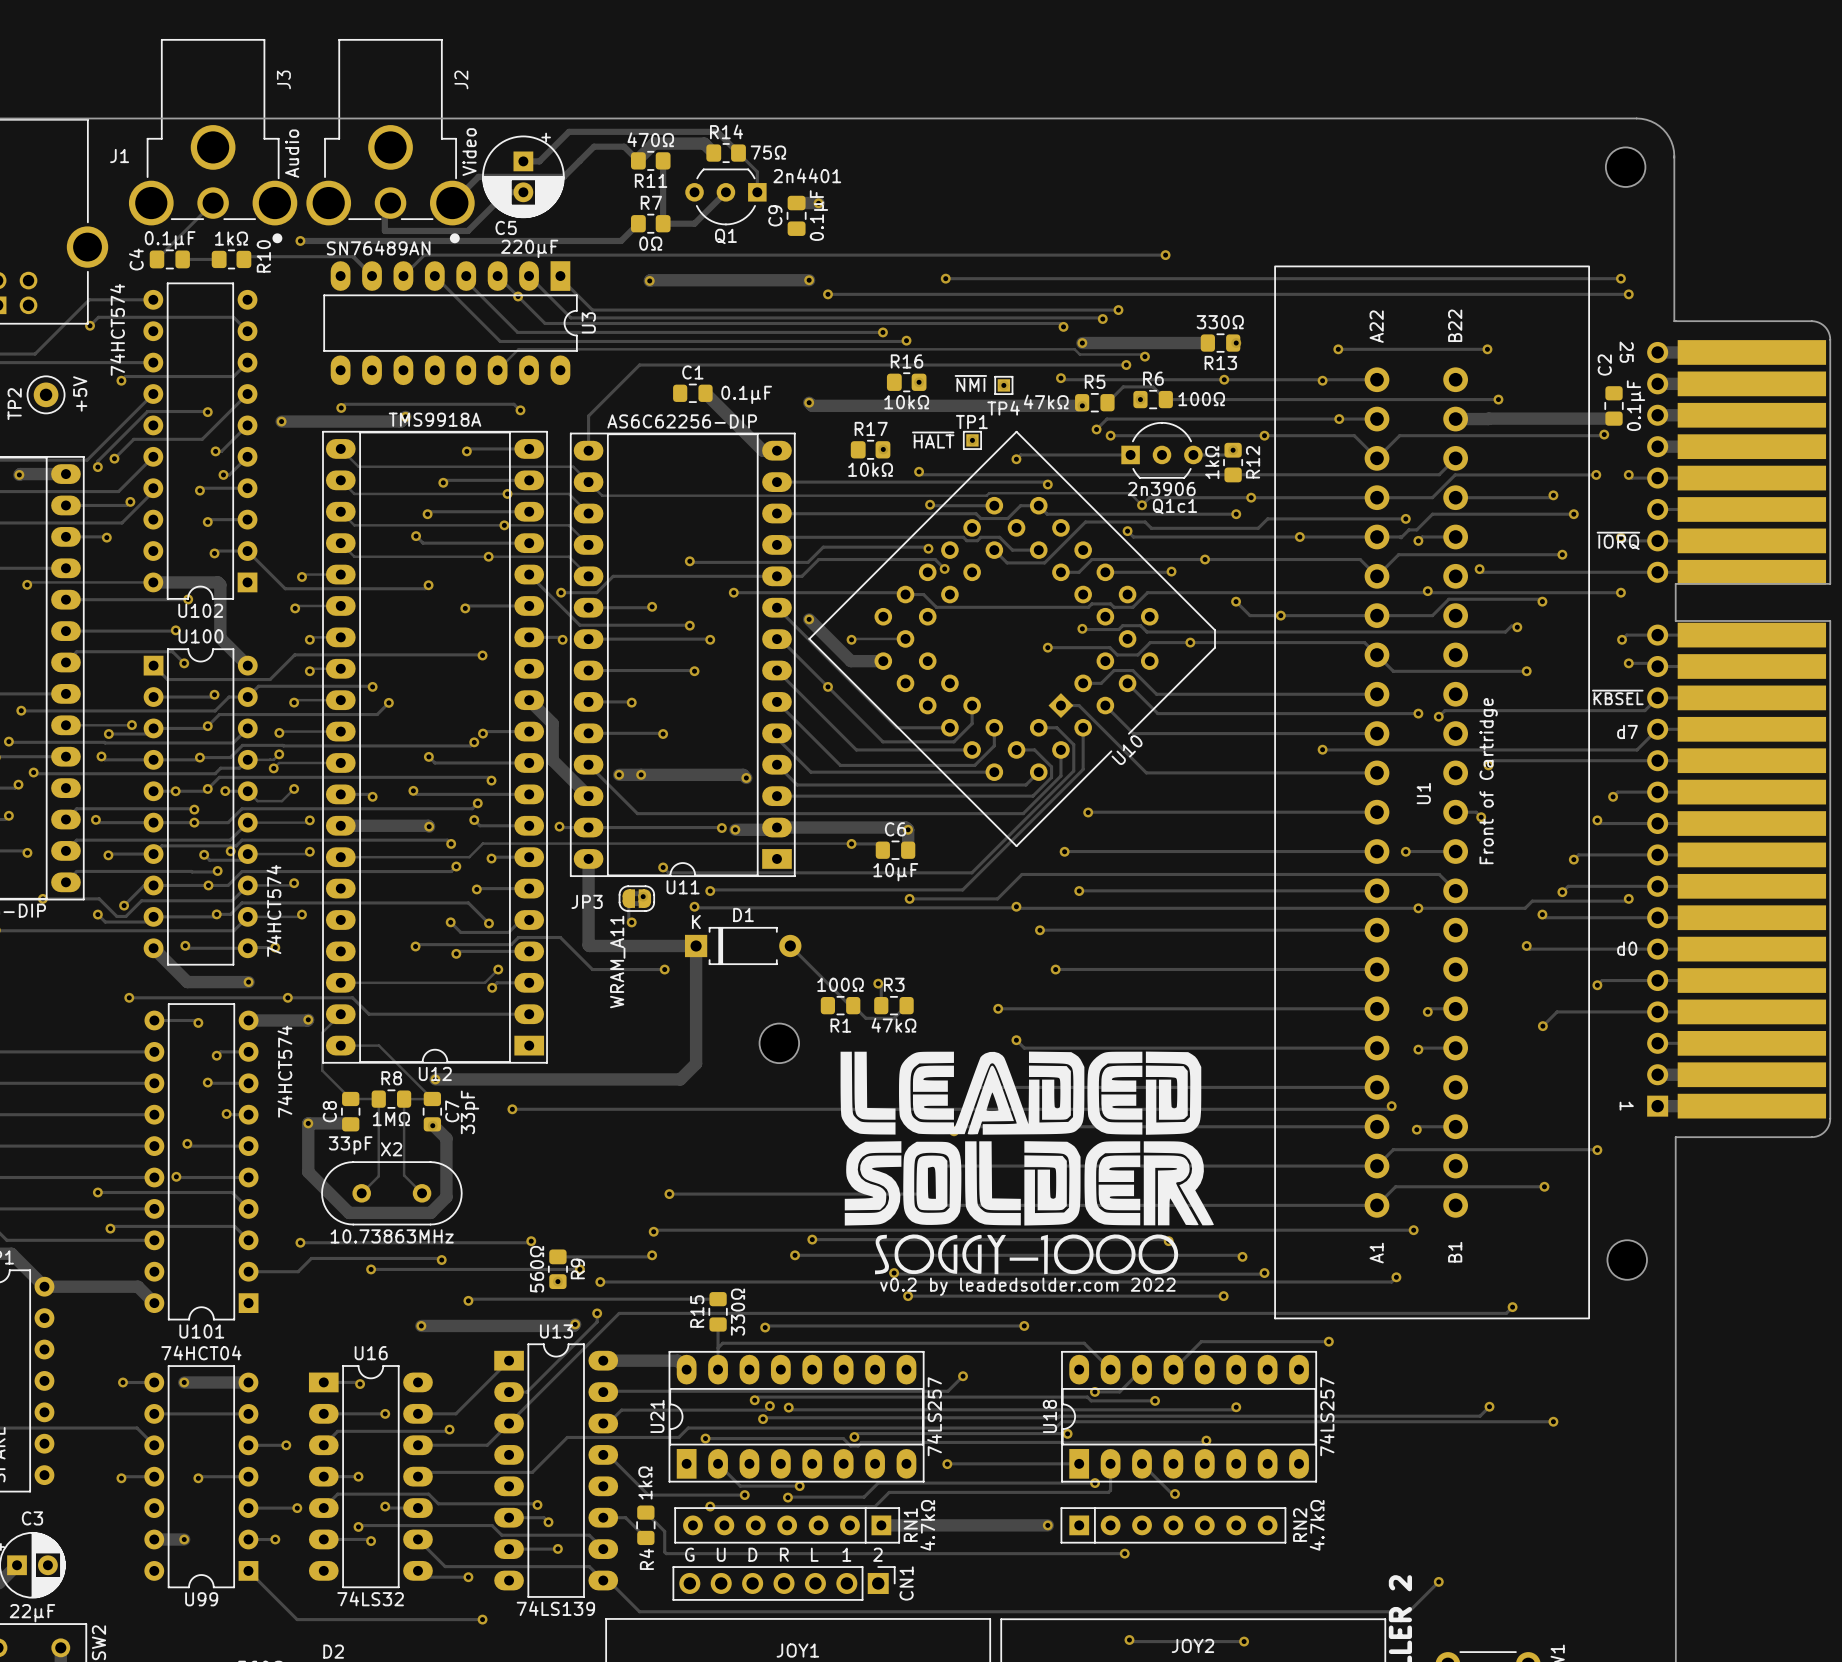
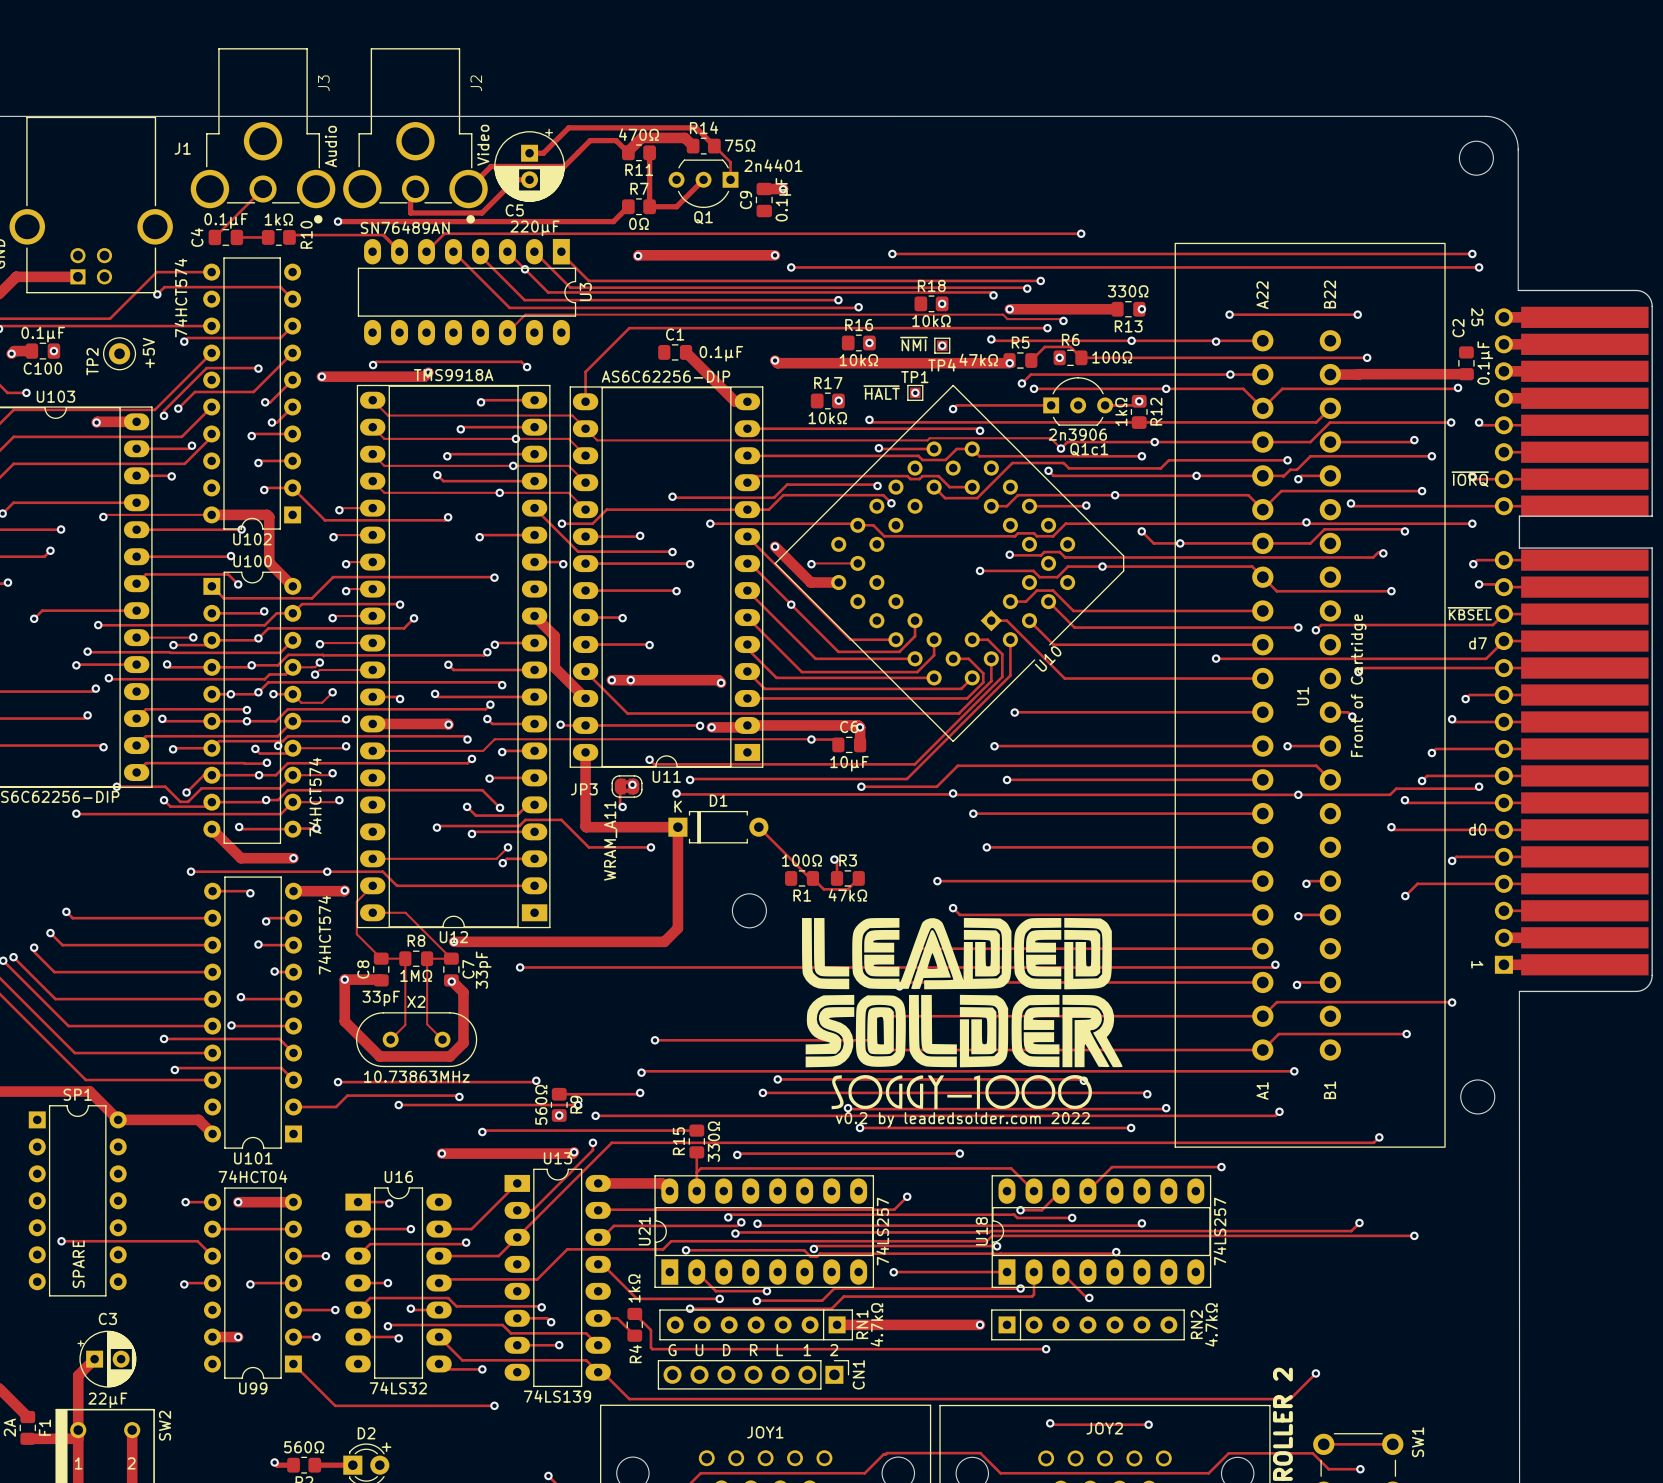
R18: none -> 10kΩ (931, 303)
via: none -> (942, 303)

